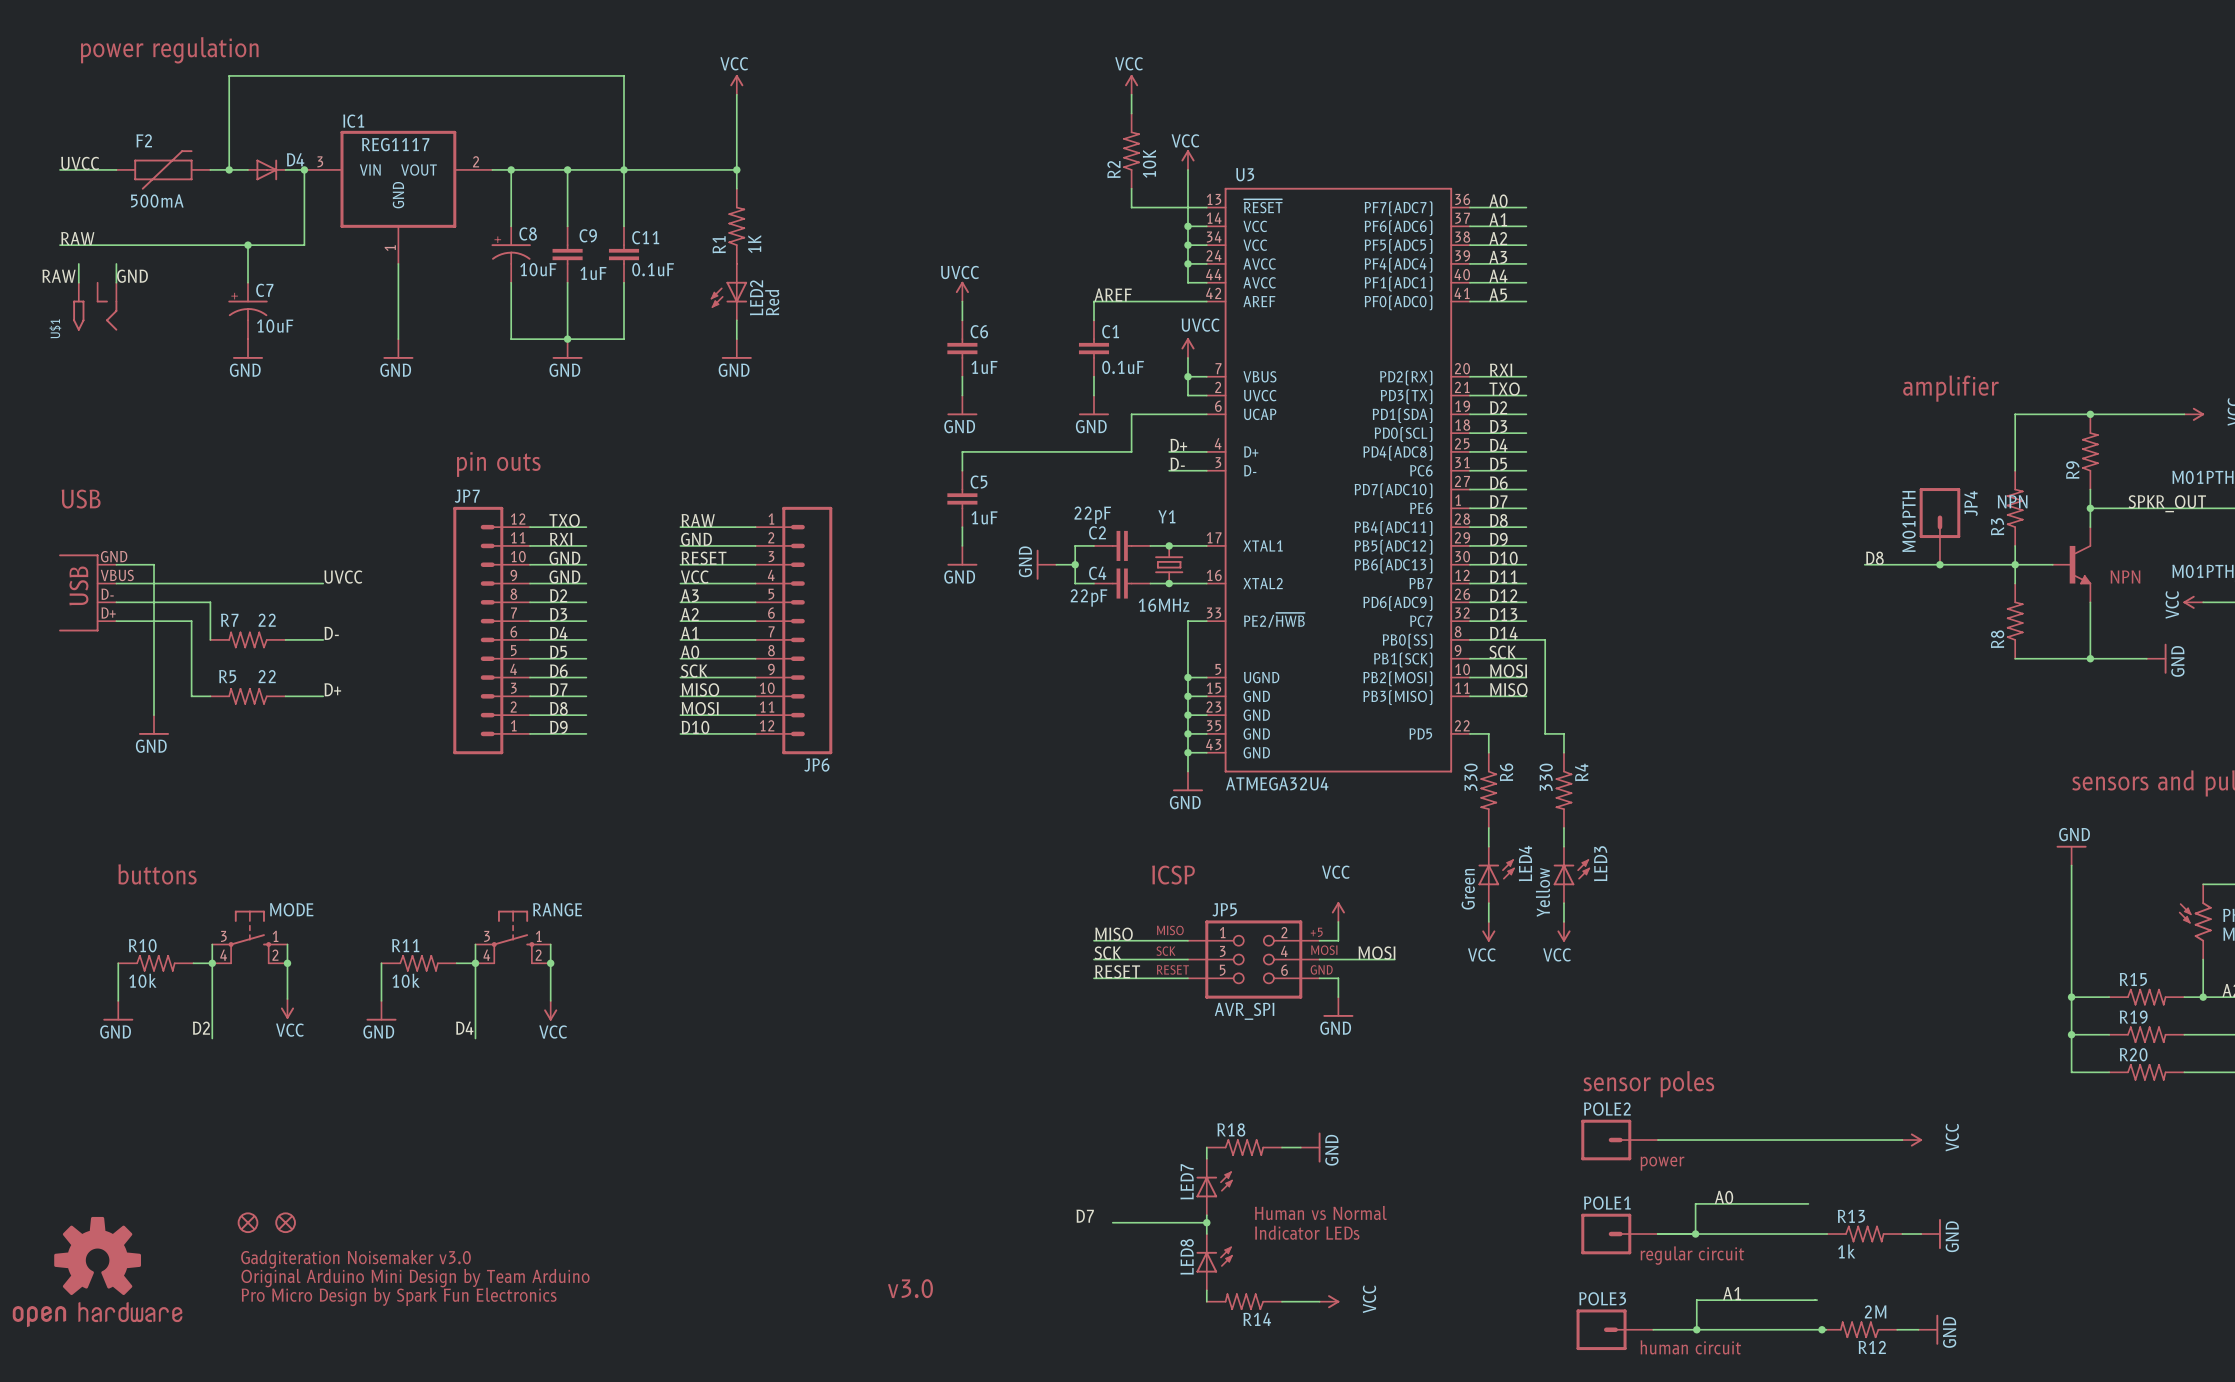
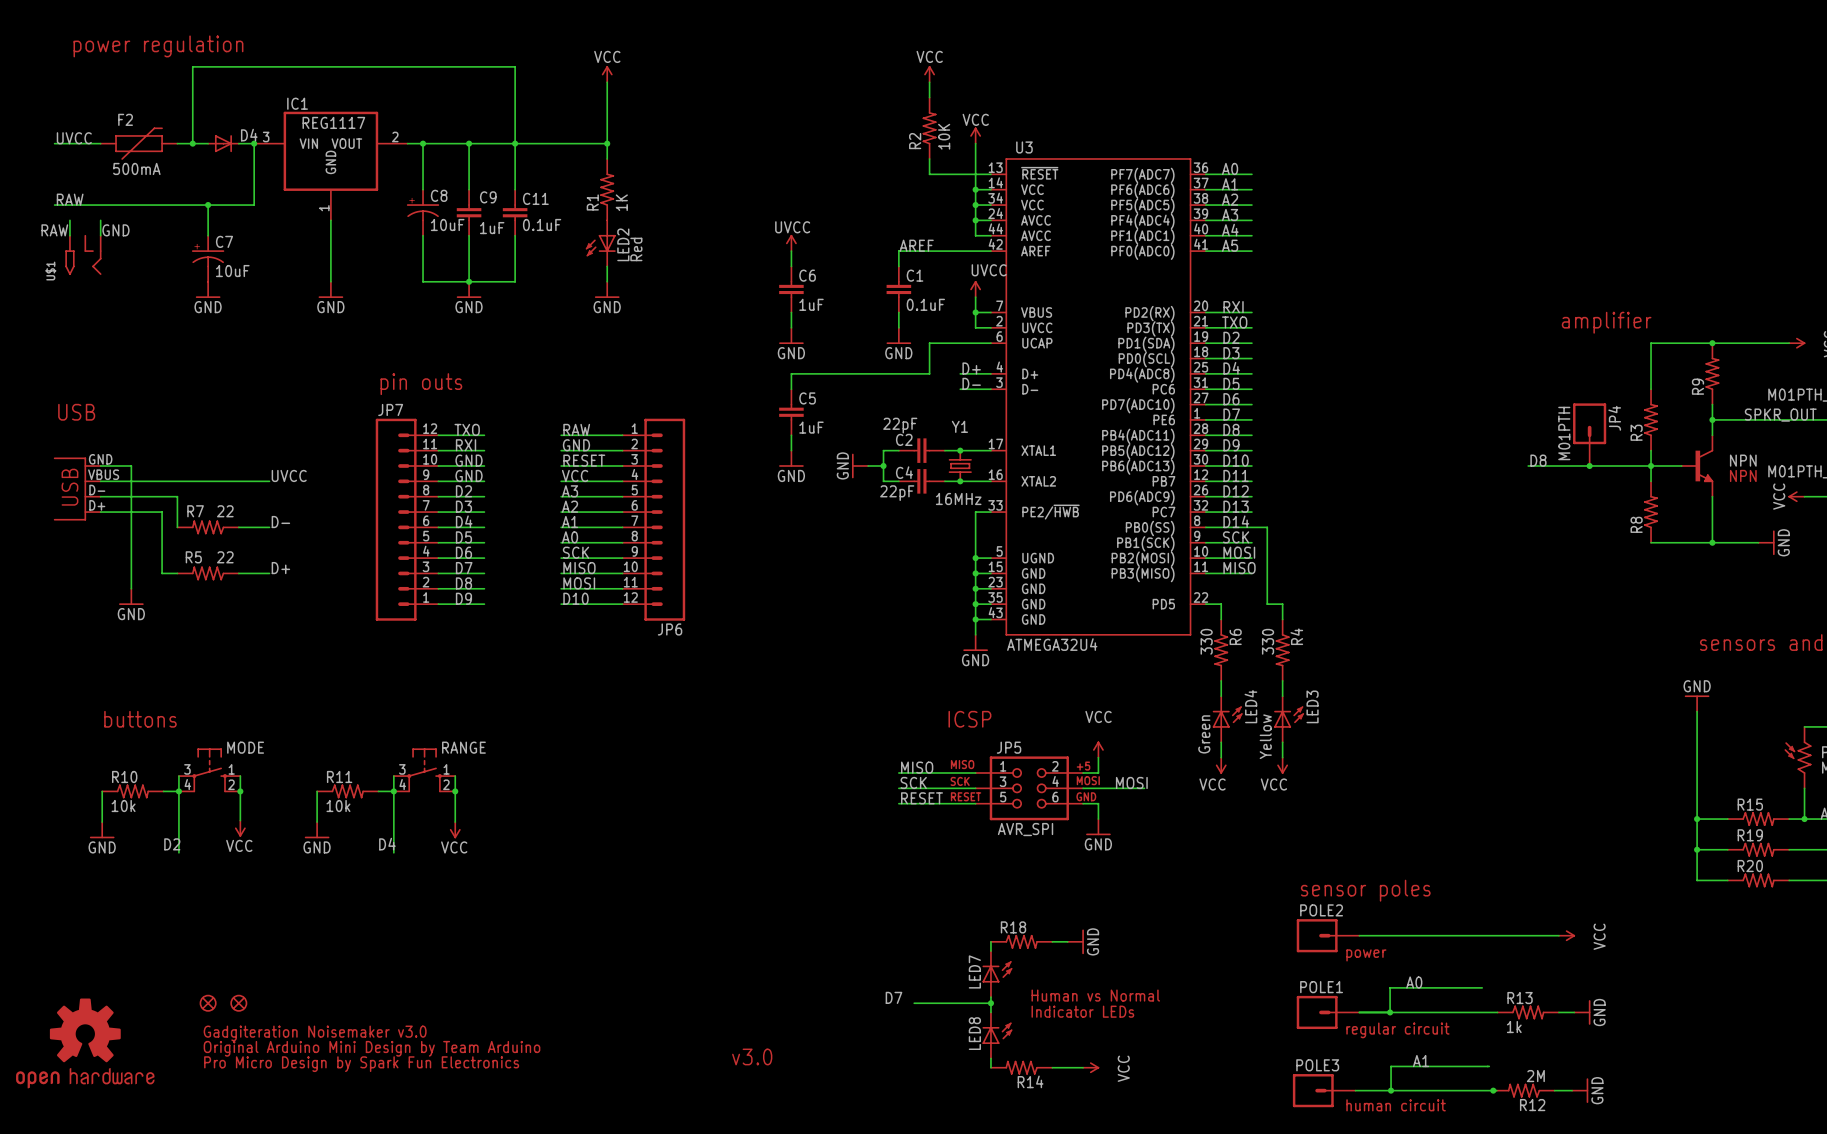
NPN name position: NPN (2012, 501) -> NPN (1743, 460)

